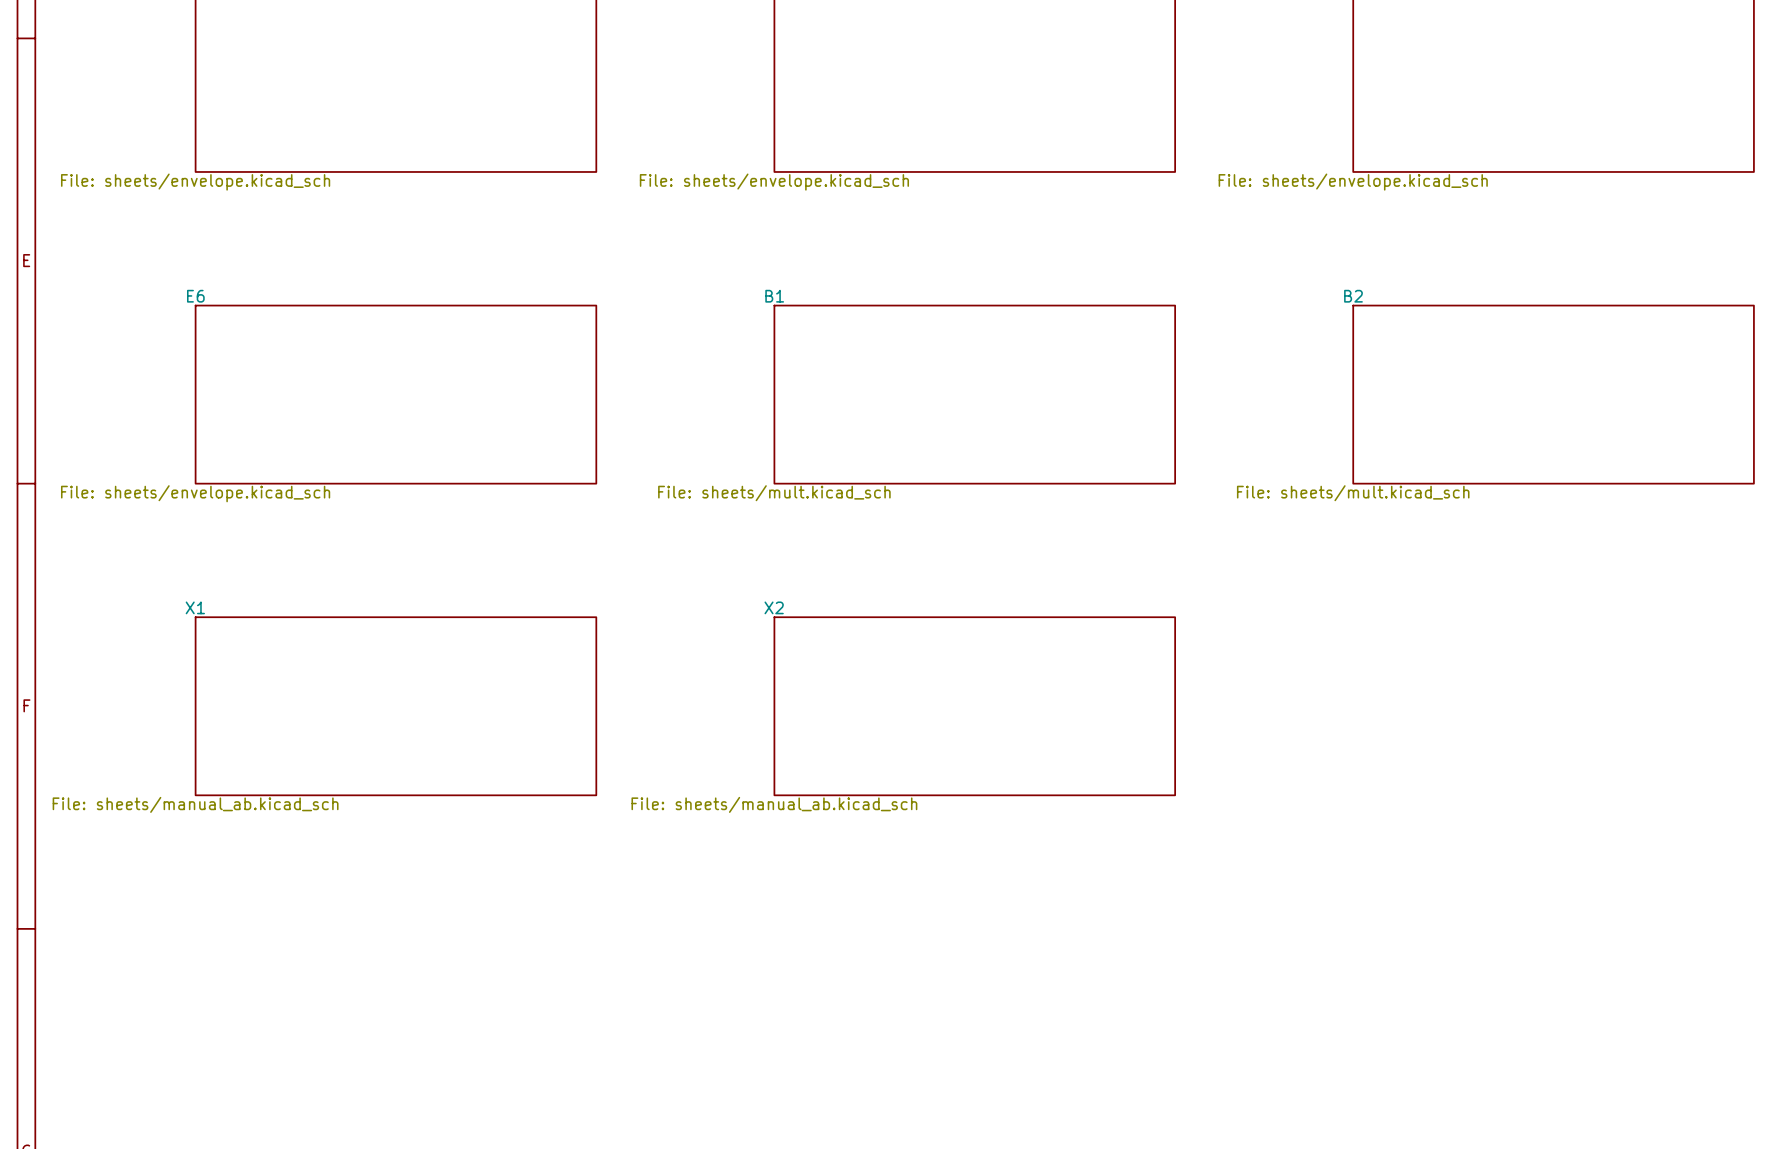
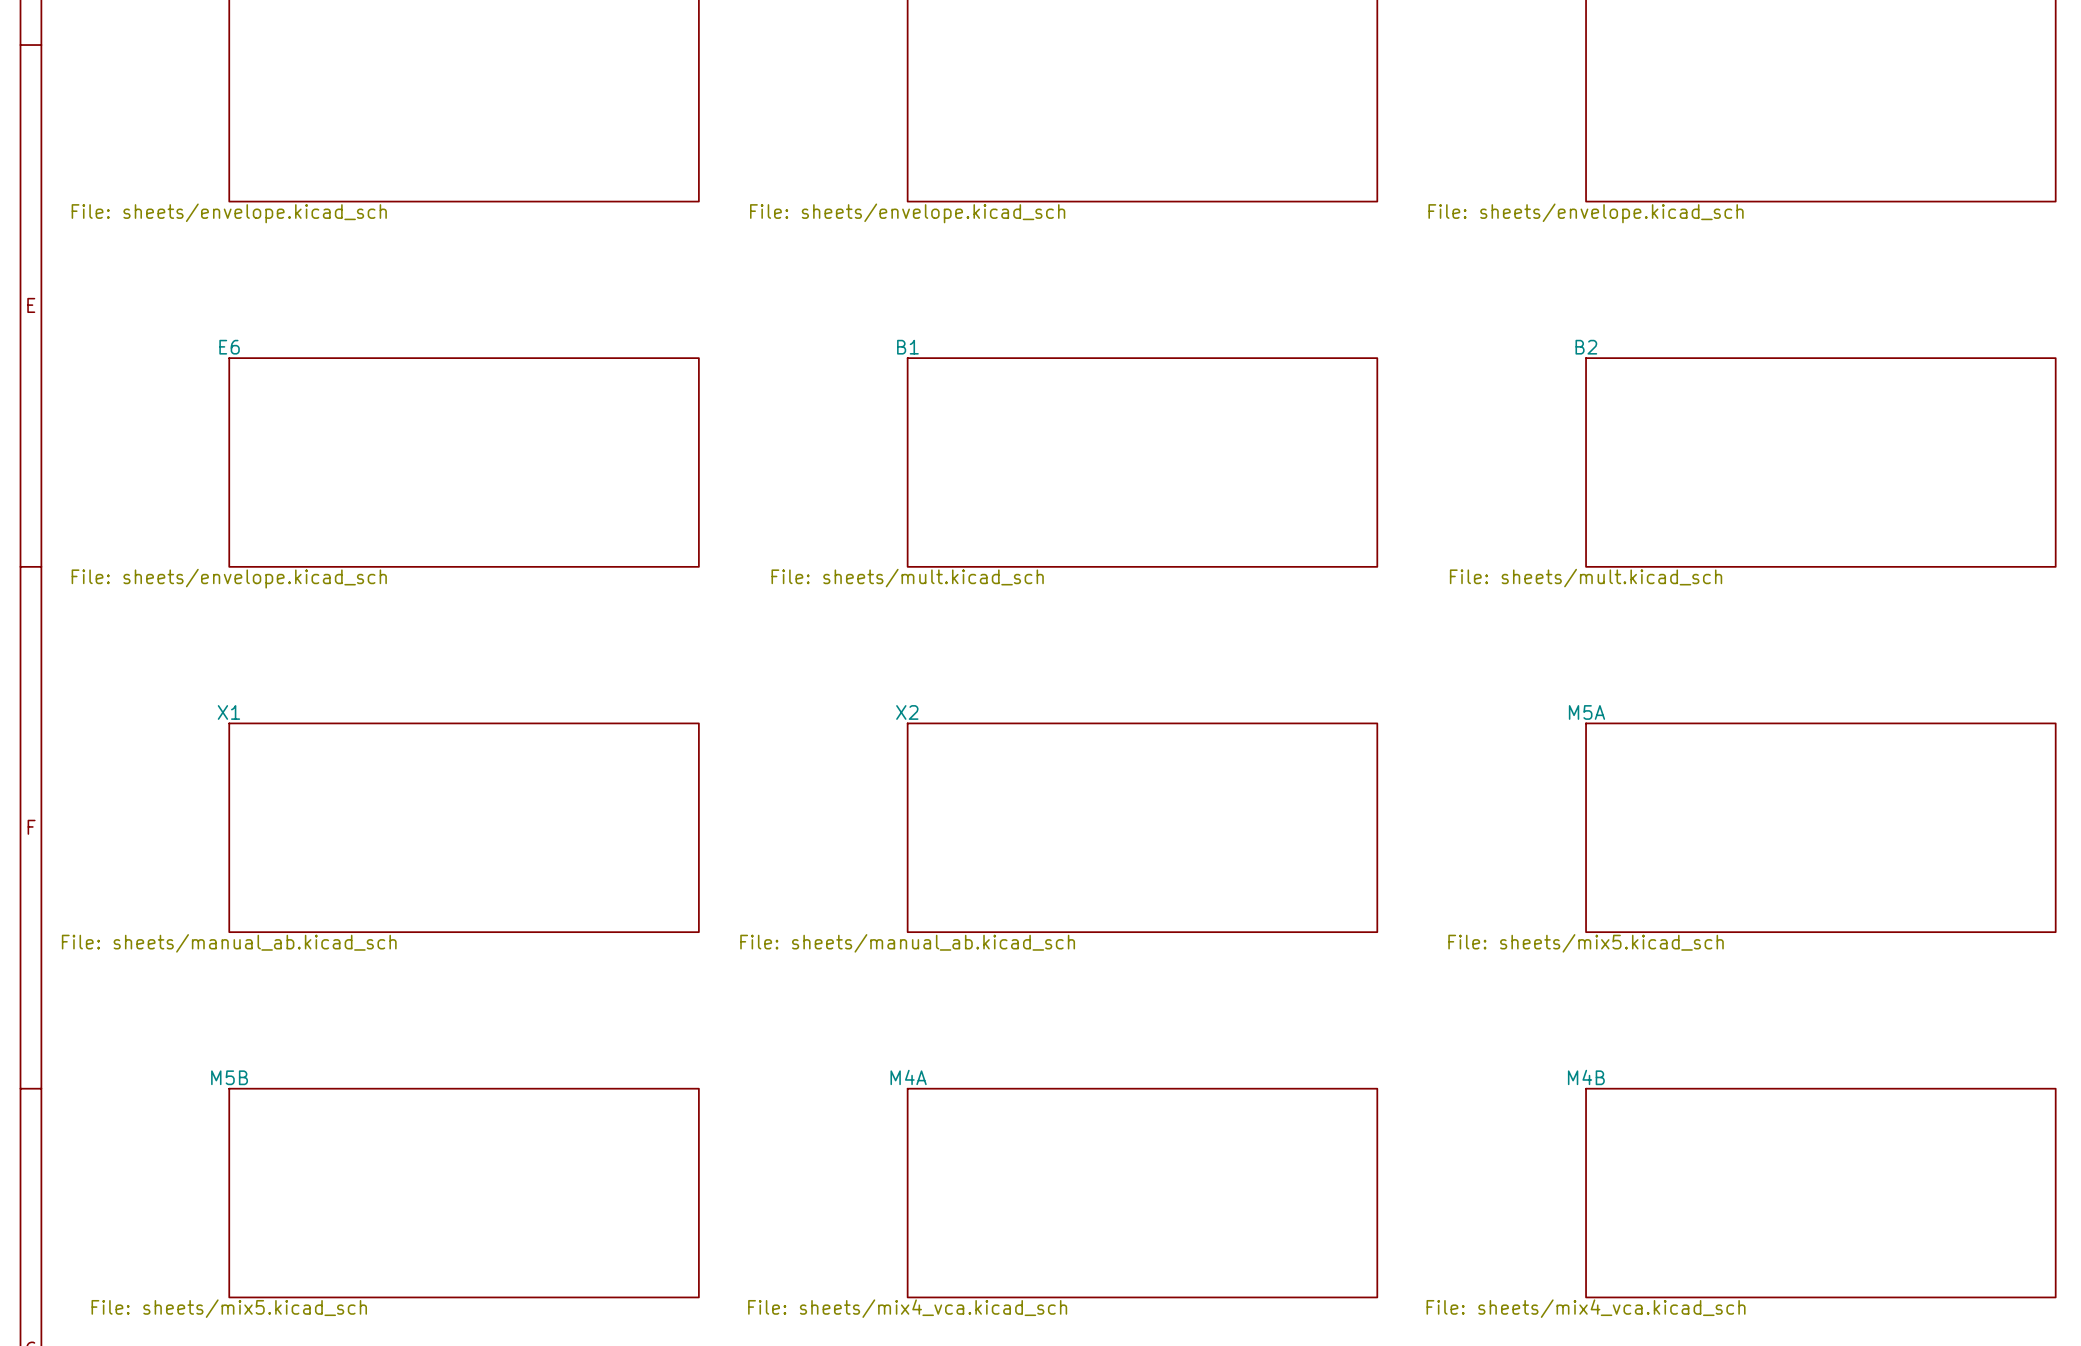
sheet M5A: none -> File: sheets/mix5.kicad_sch (1820, 827)
sheet M5B: none -> File: sheets/mix5.kicad_sch (464, 1193)
sheet M4A: none -> File: sheets/mix4_vca.kicad_sch (1142, 1193)
sheet M4B: none -> File: sheets/mix4_vca.kicad_sch (1820, 1193)

